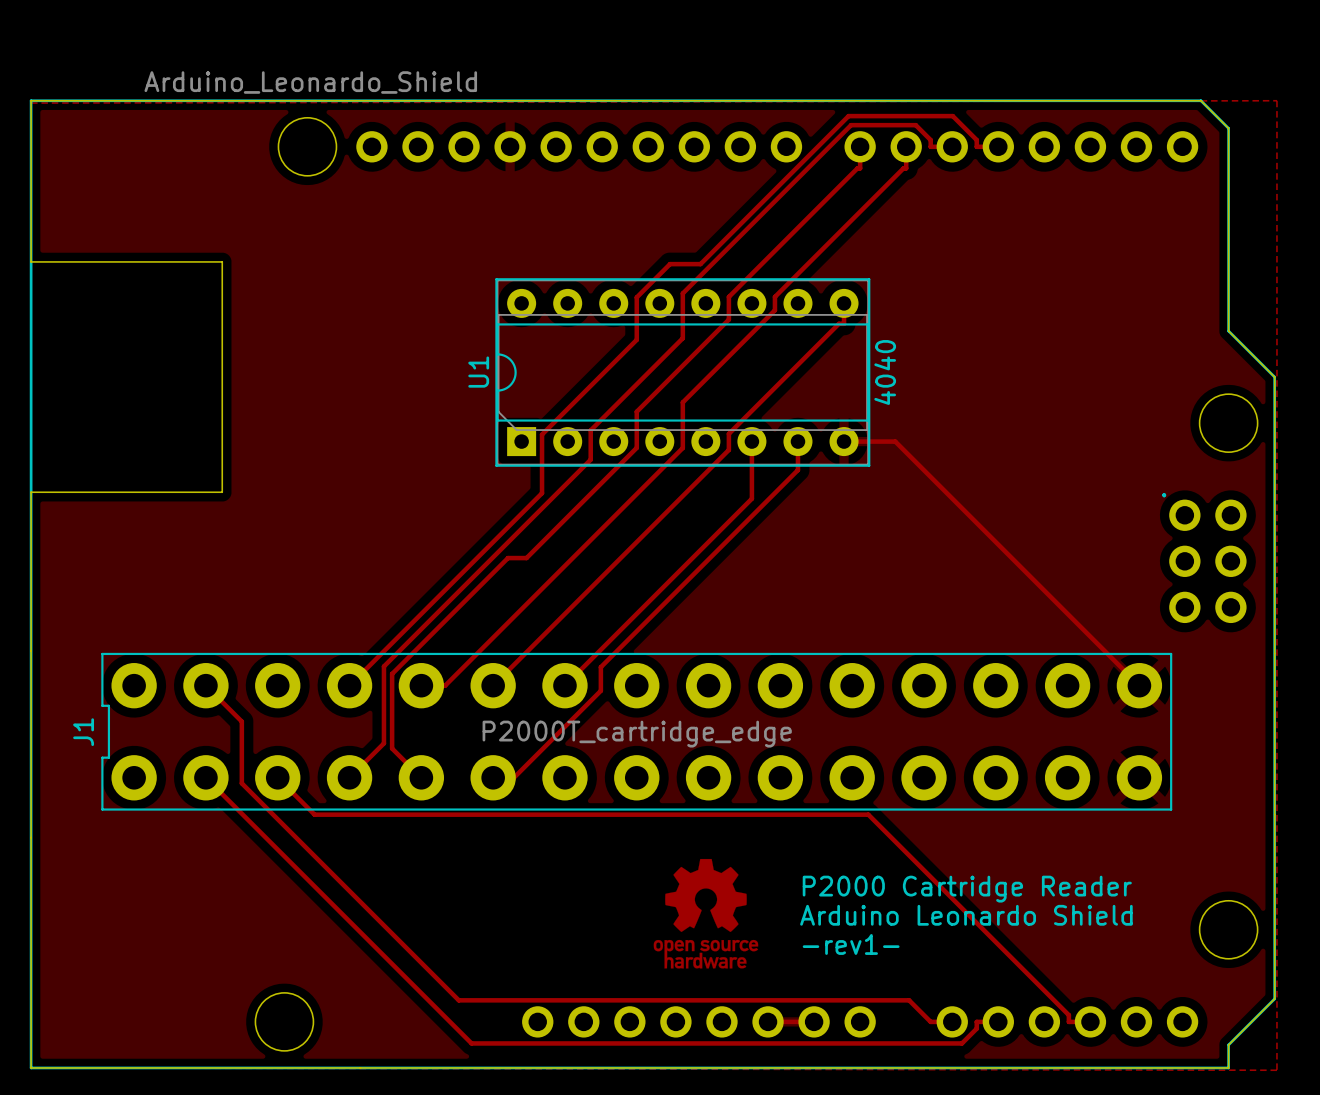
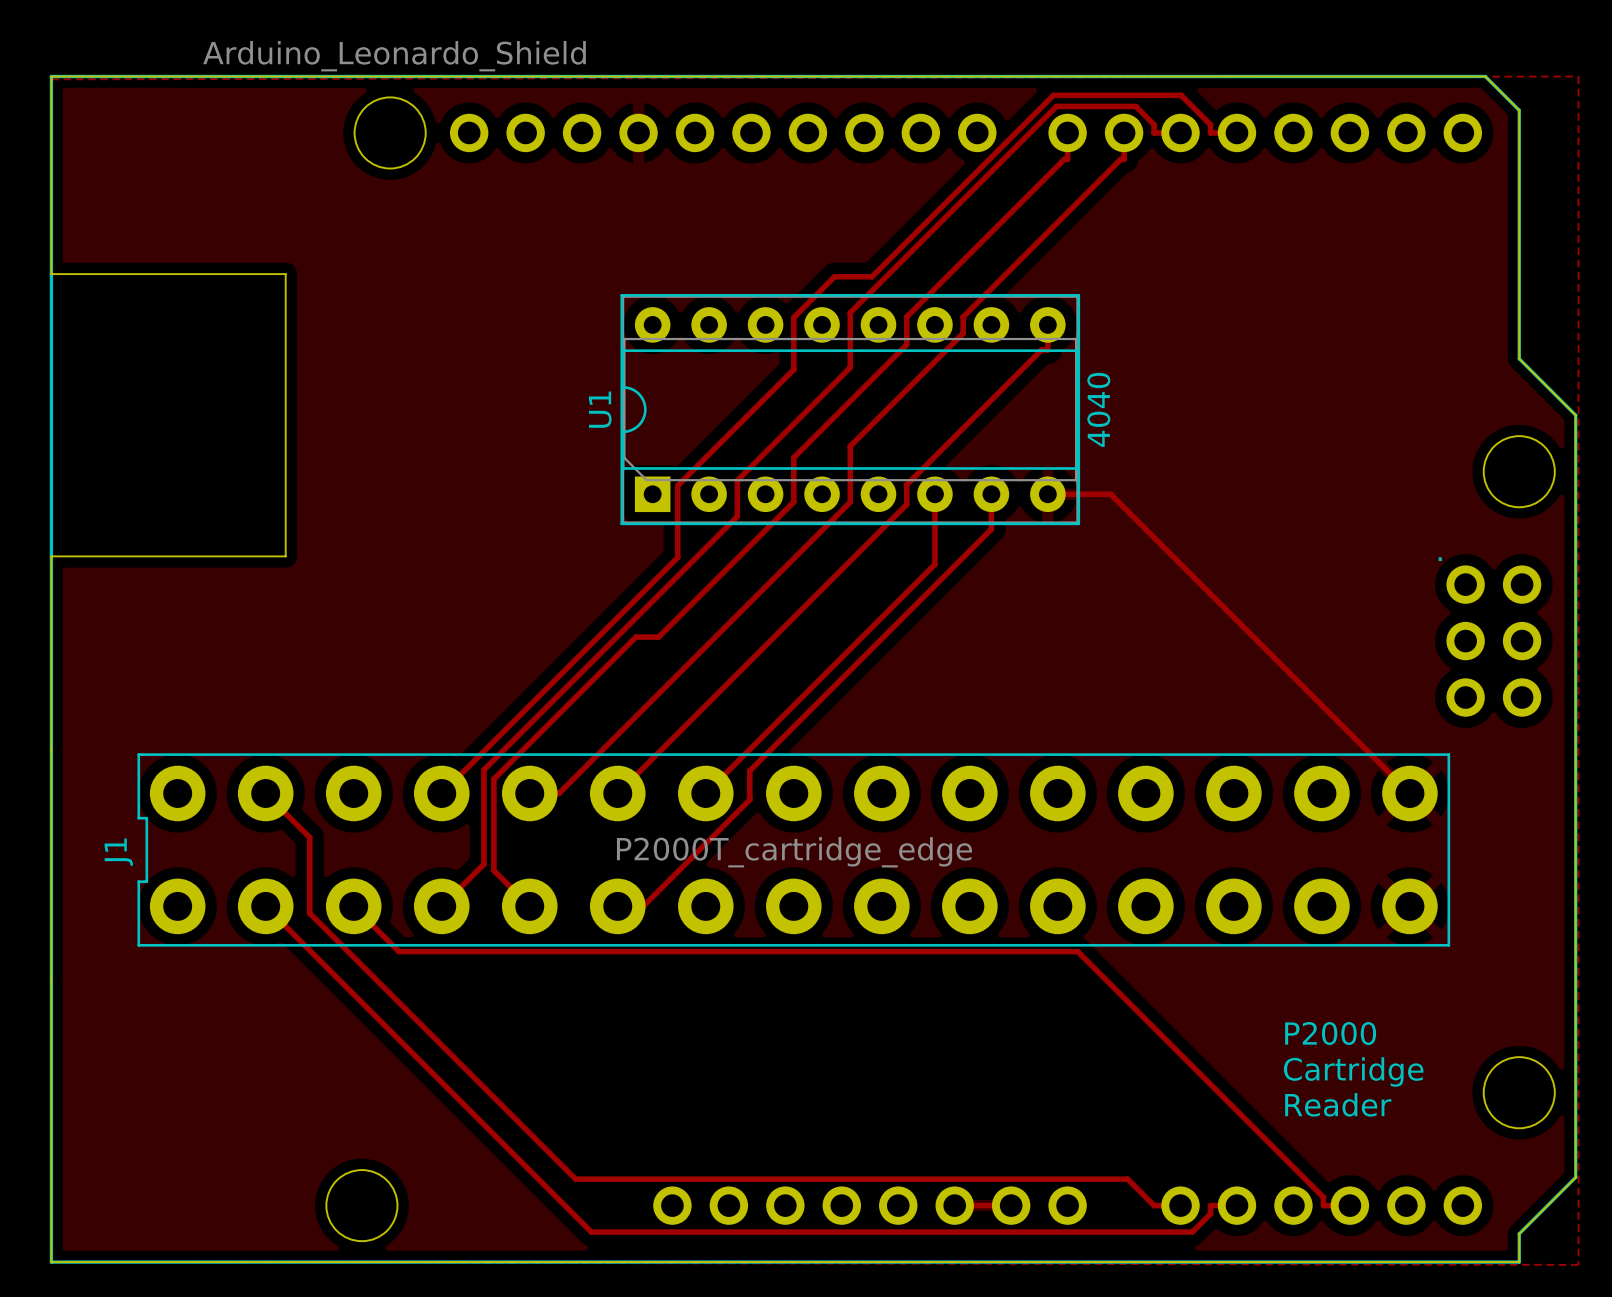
drawing: [653, 858, 759, 969] -> none
text: none -> P2000 (1330, 1033)
text: P2000 Cartridge Reader (967, 889) -> none
text: none -> Cartridge (1353, 1072)
text: Arduino Leonardo Shield (966, 915) -> none
text: none -> Reader (1338, 1104)
text: -rev1- (851, 944) -> none

